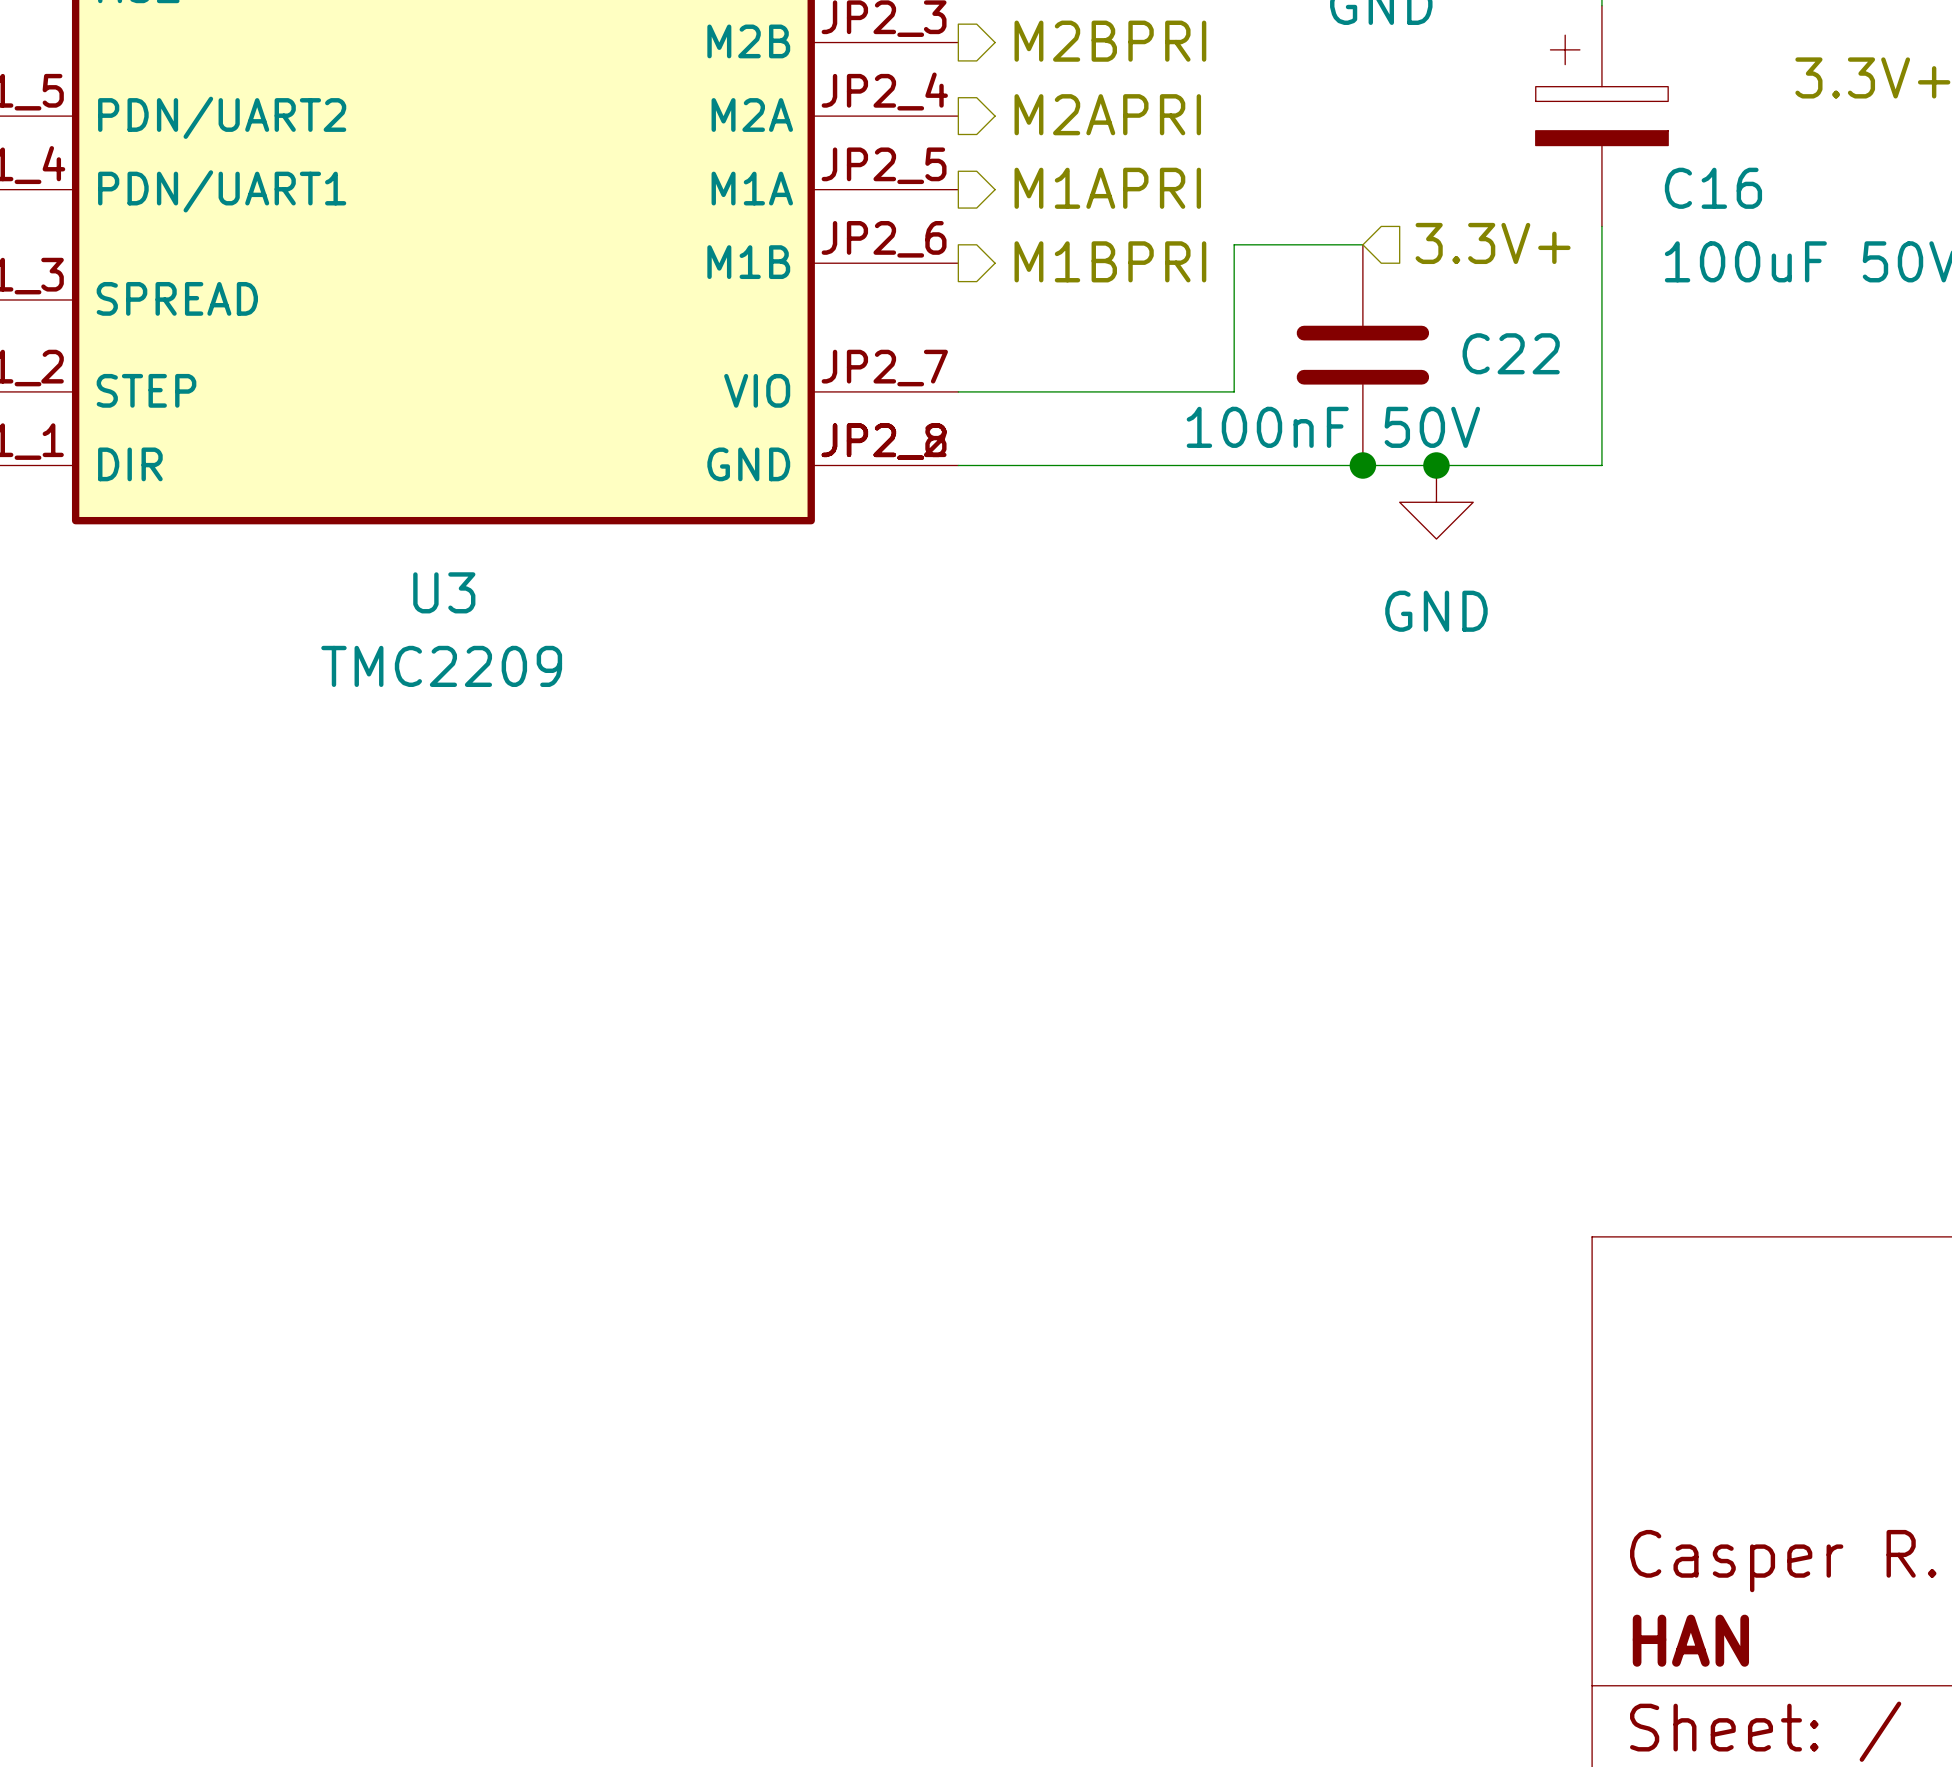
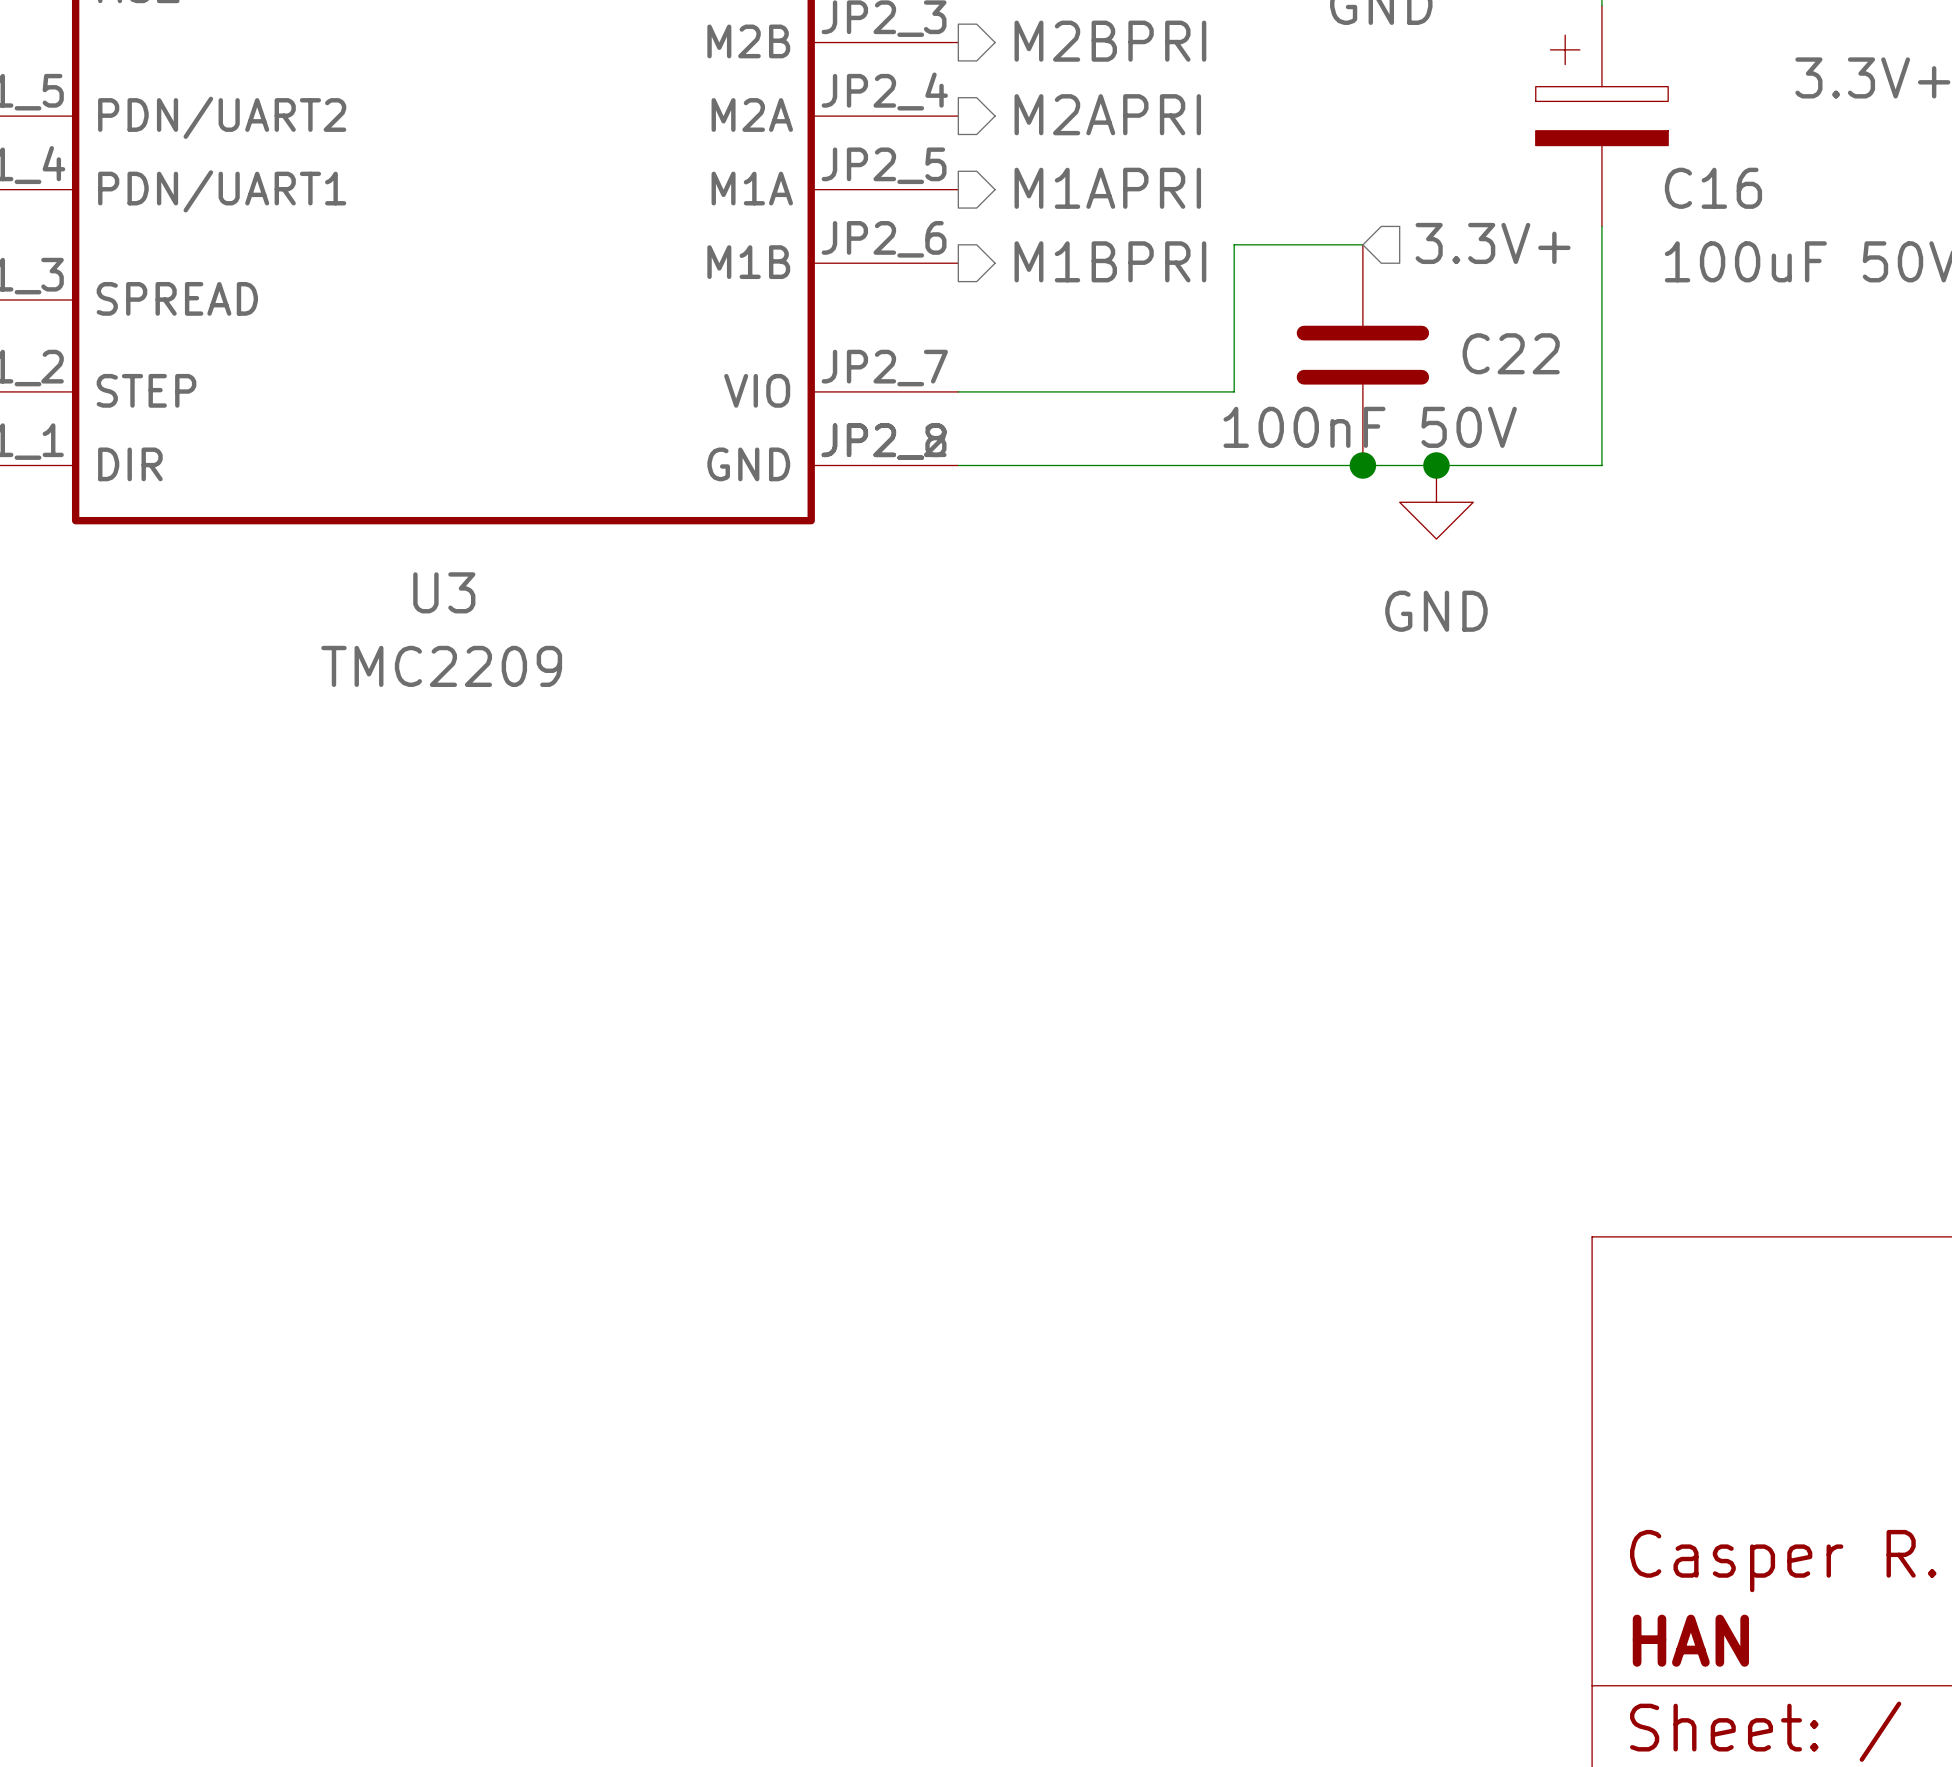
C22 value position: 100nF 50V (1333, 427) -> 100nF 50V (1370, 427)

